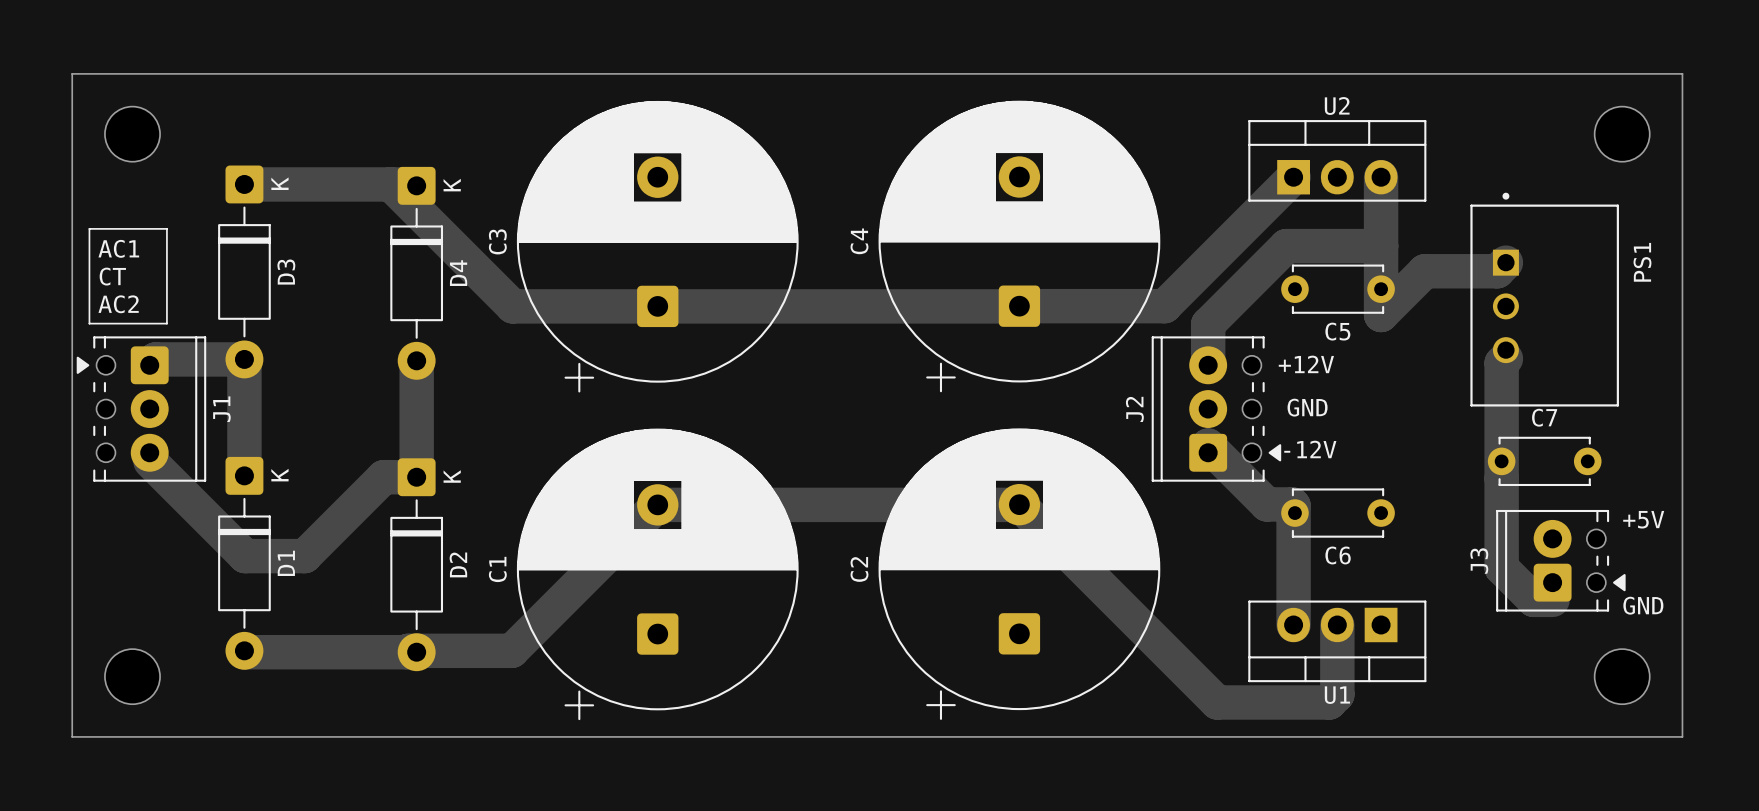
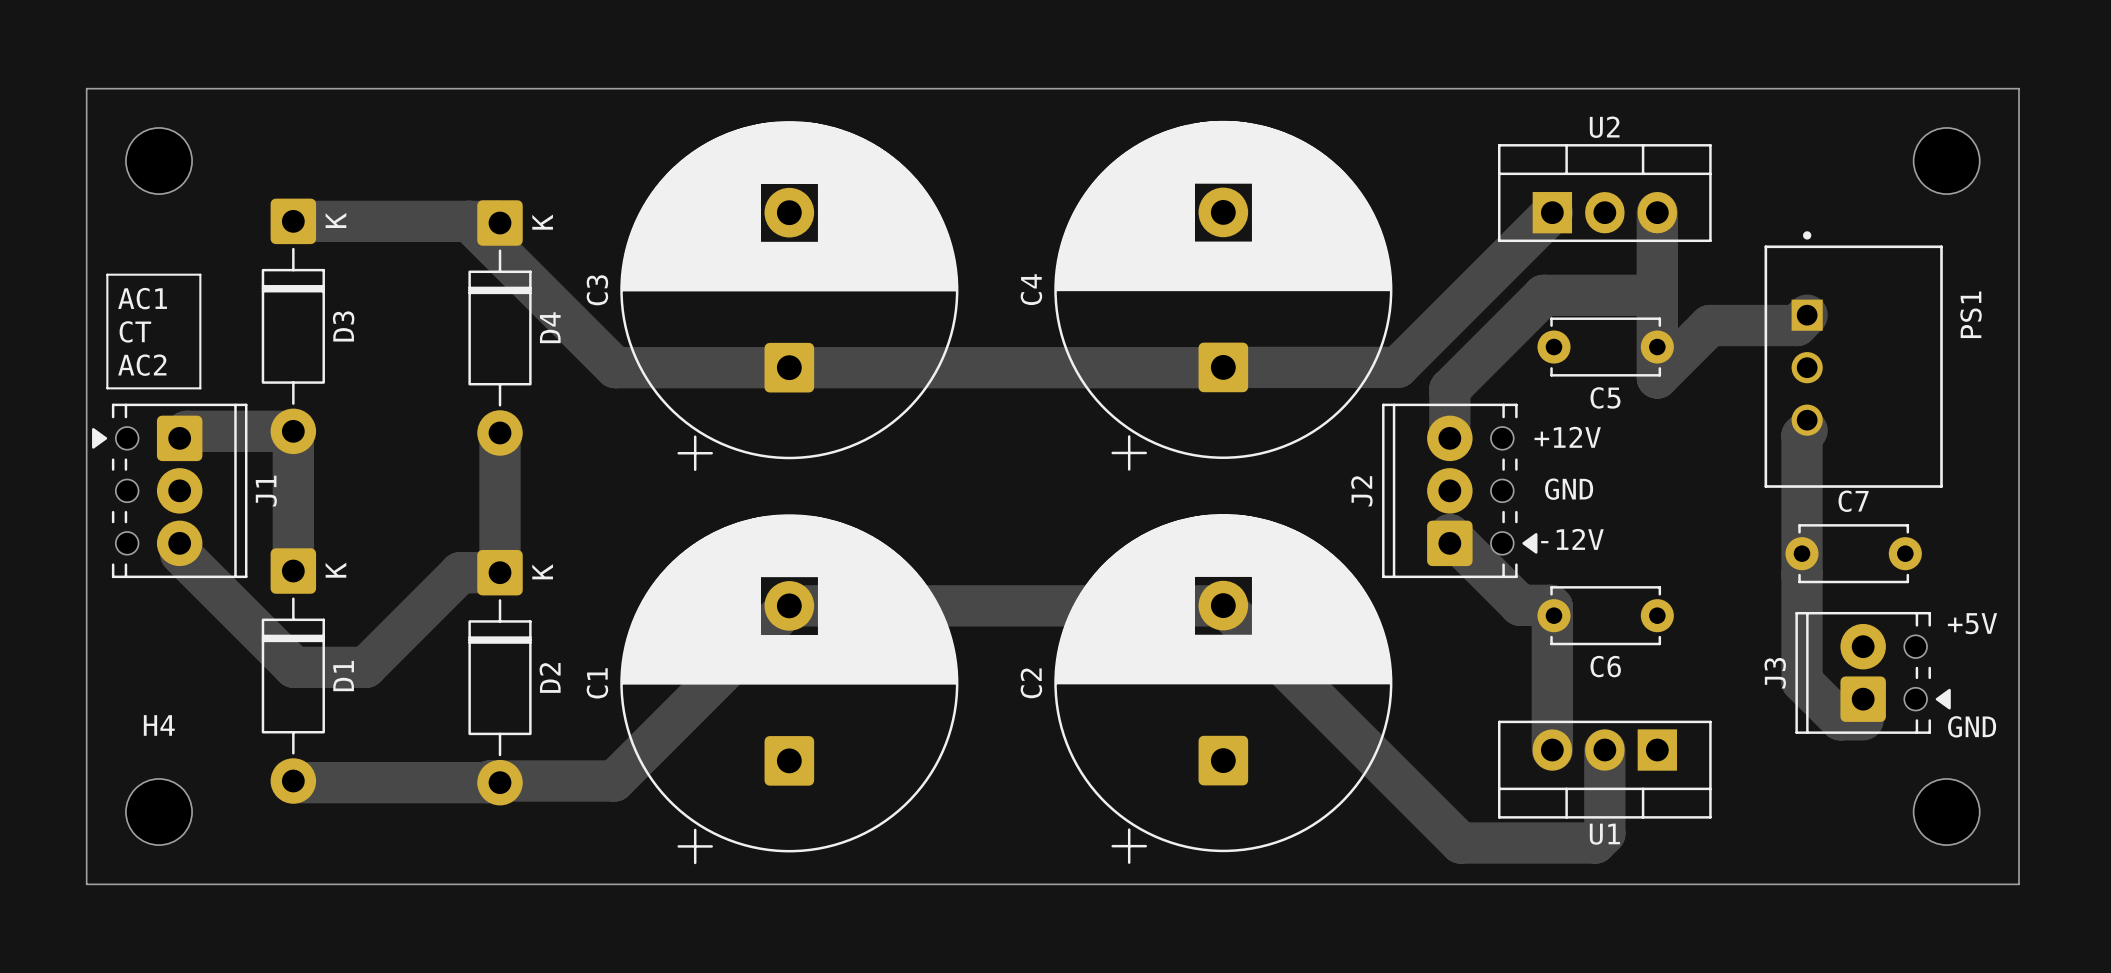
H4 name: none -> H4 (159, 725)

